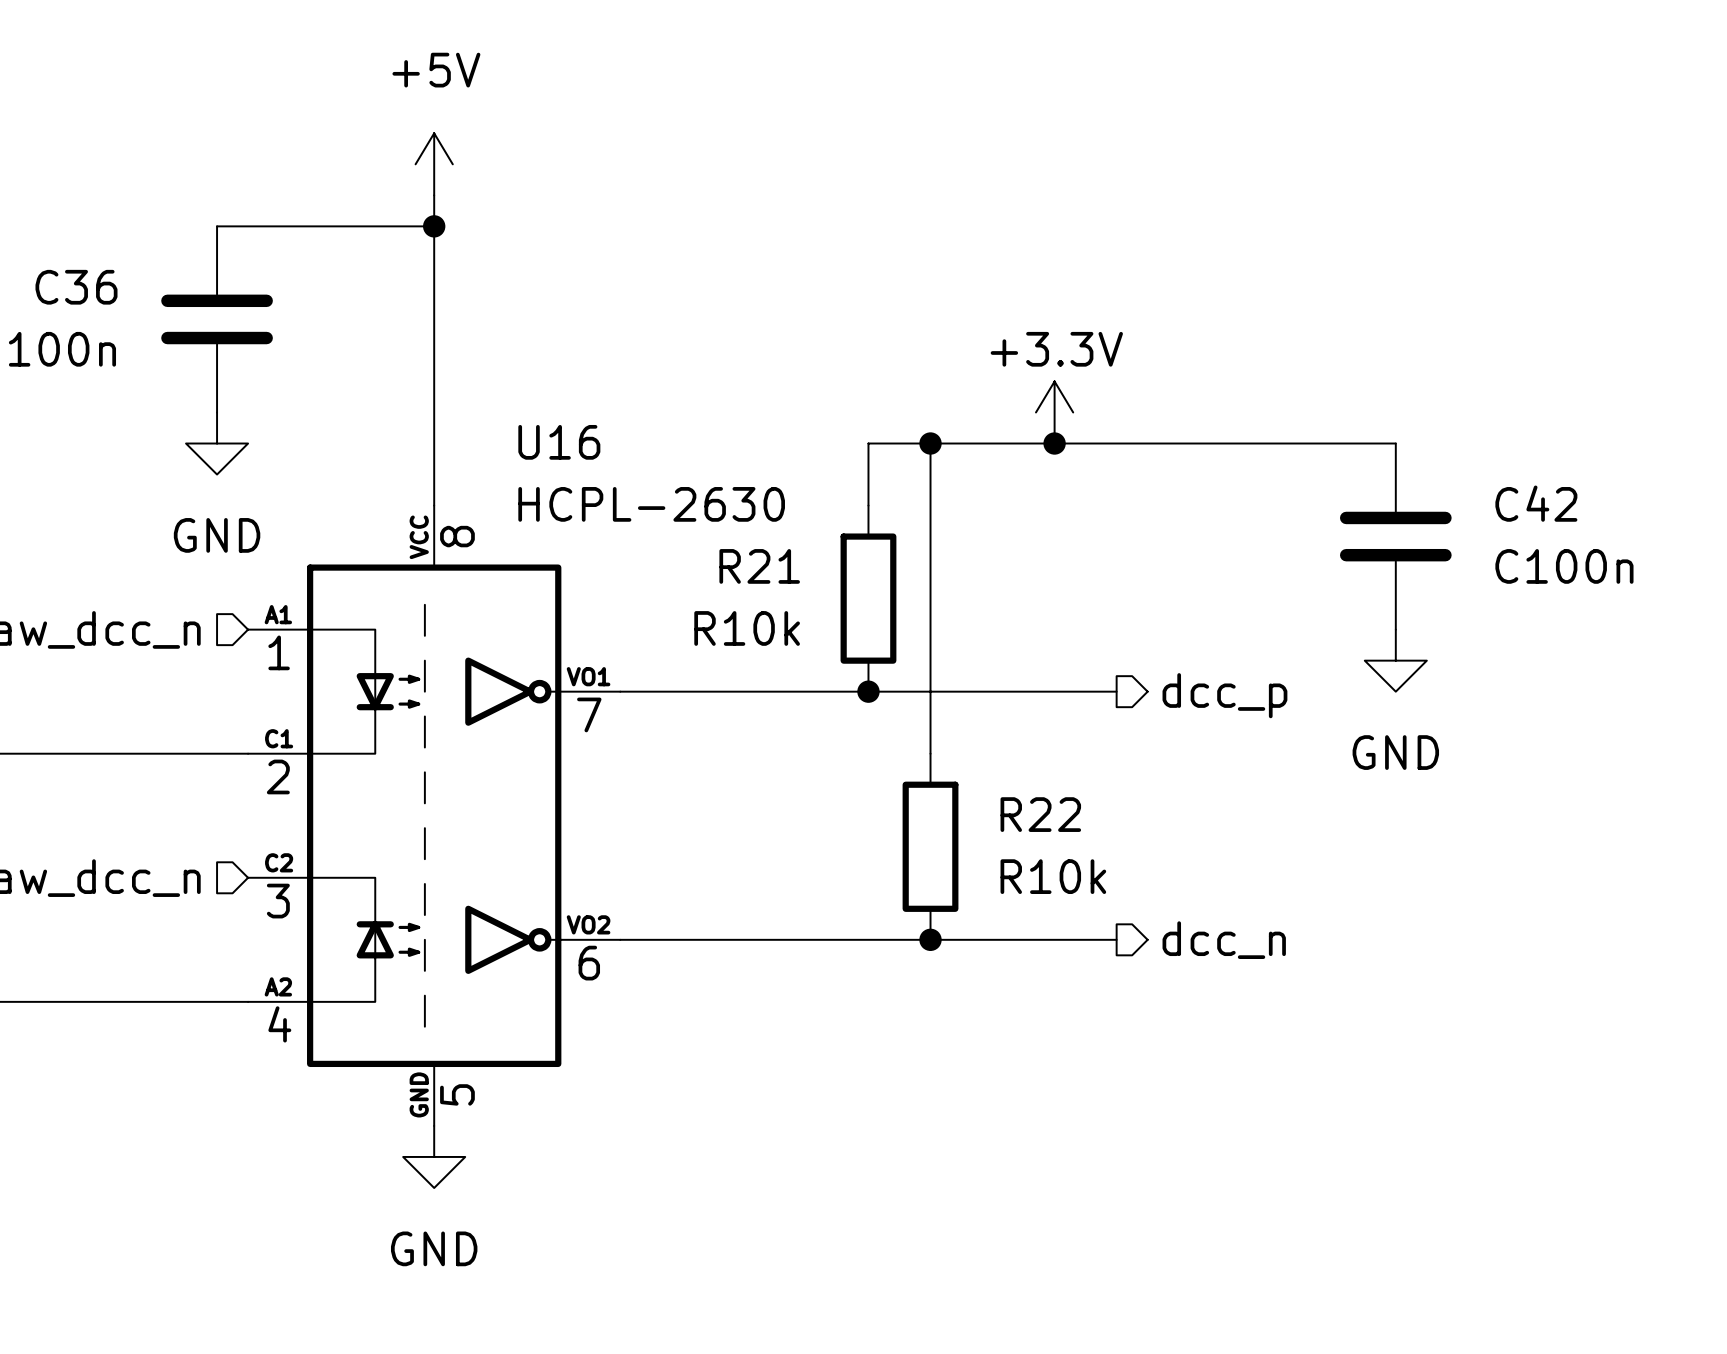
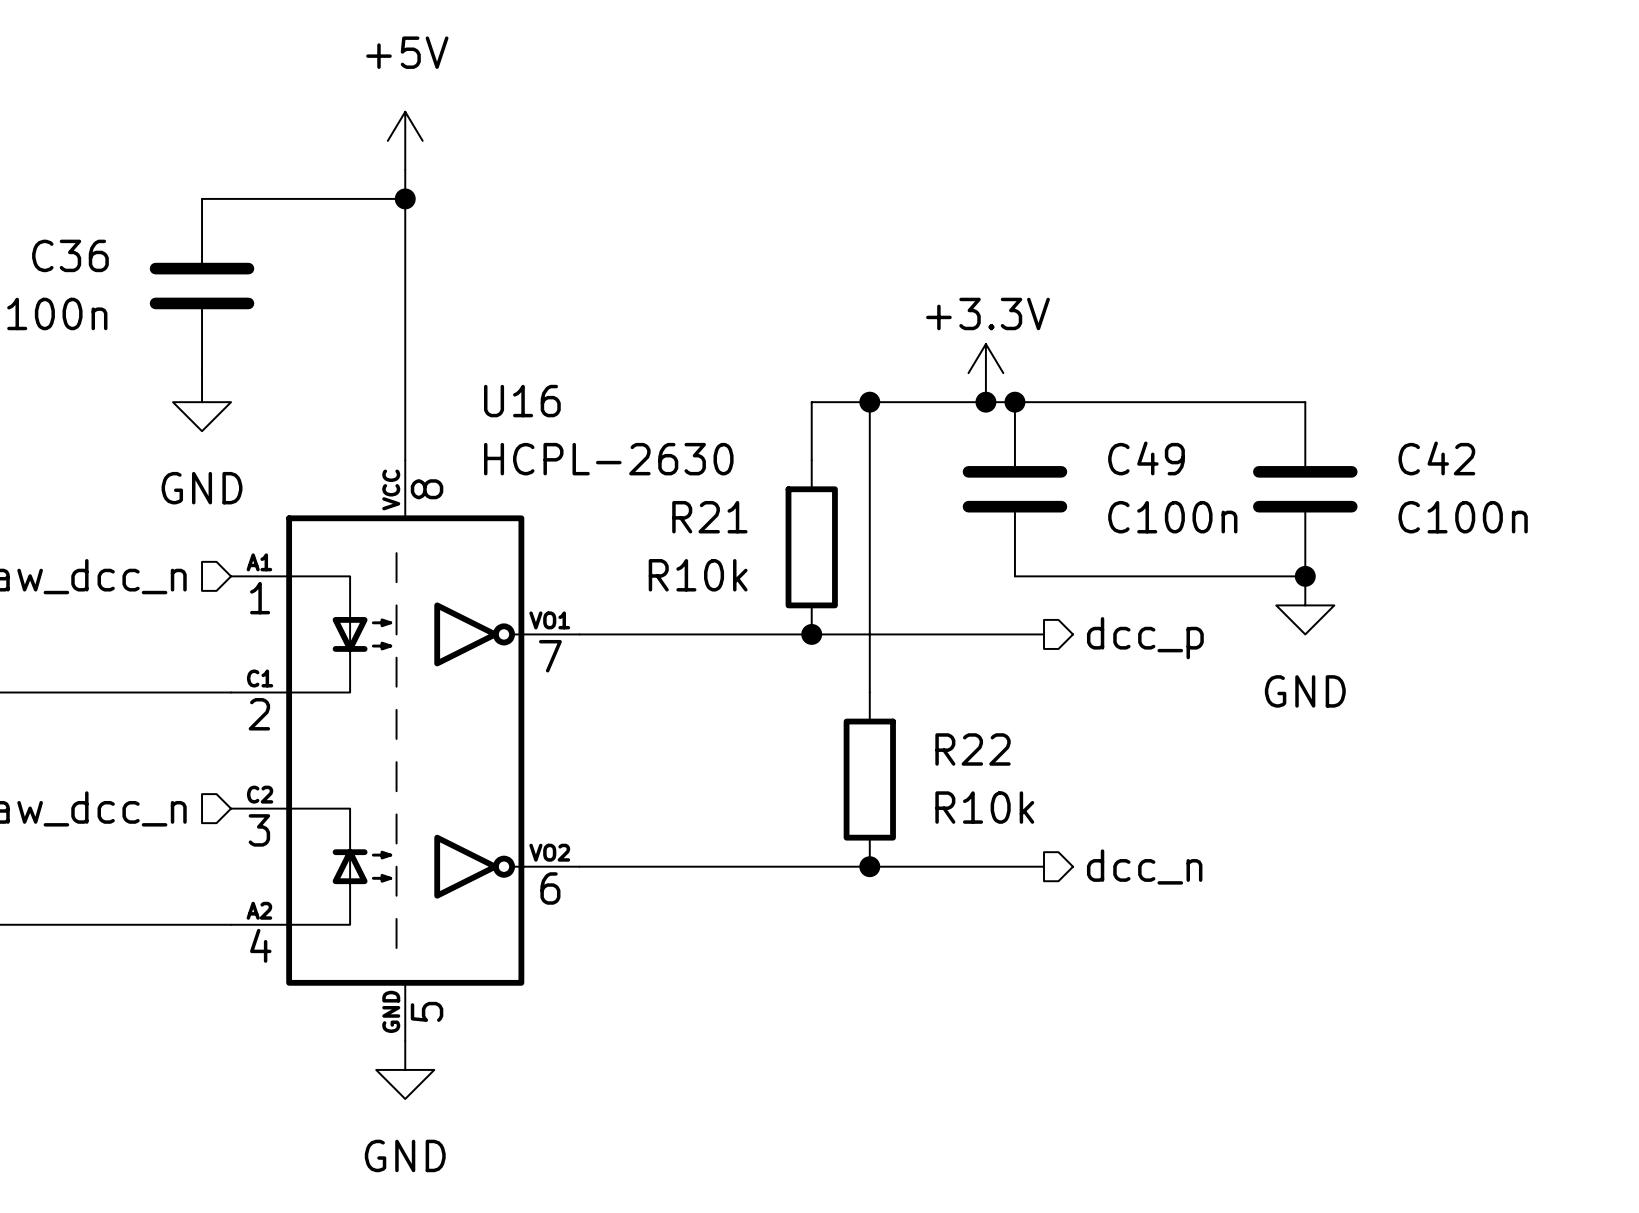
junction: none -> (1014, 402)
C49: none -> C100n (1014, 489)
wire: none -> (1014, 576) (1305, 576)
junction: none -> (1305, 576)

